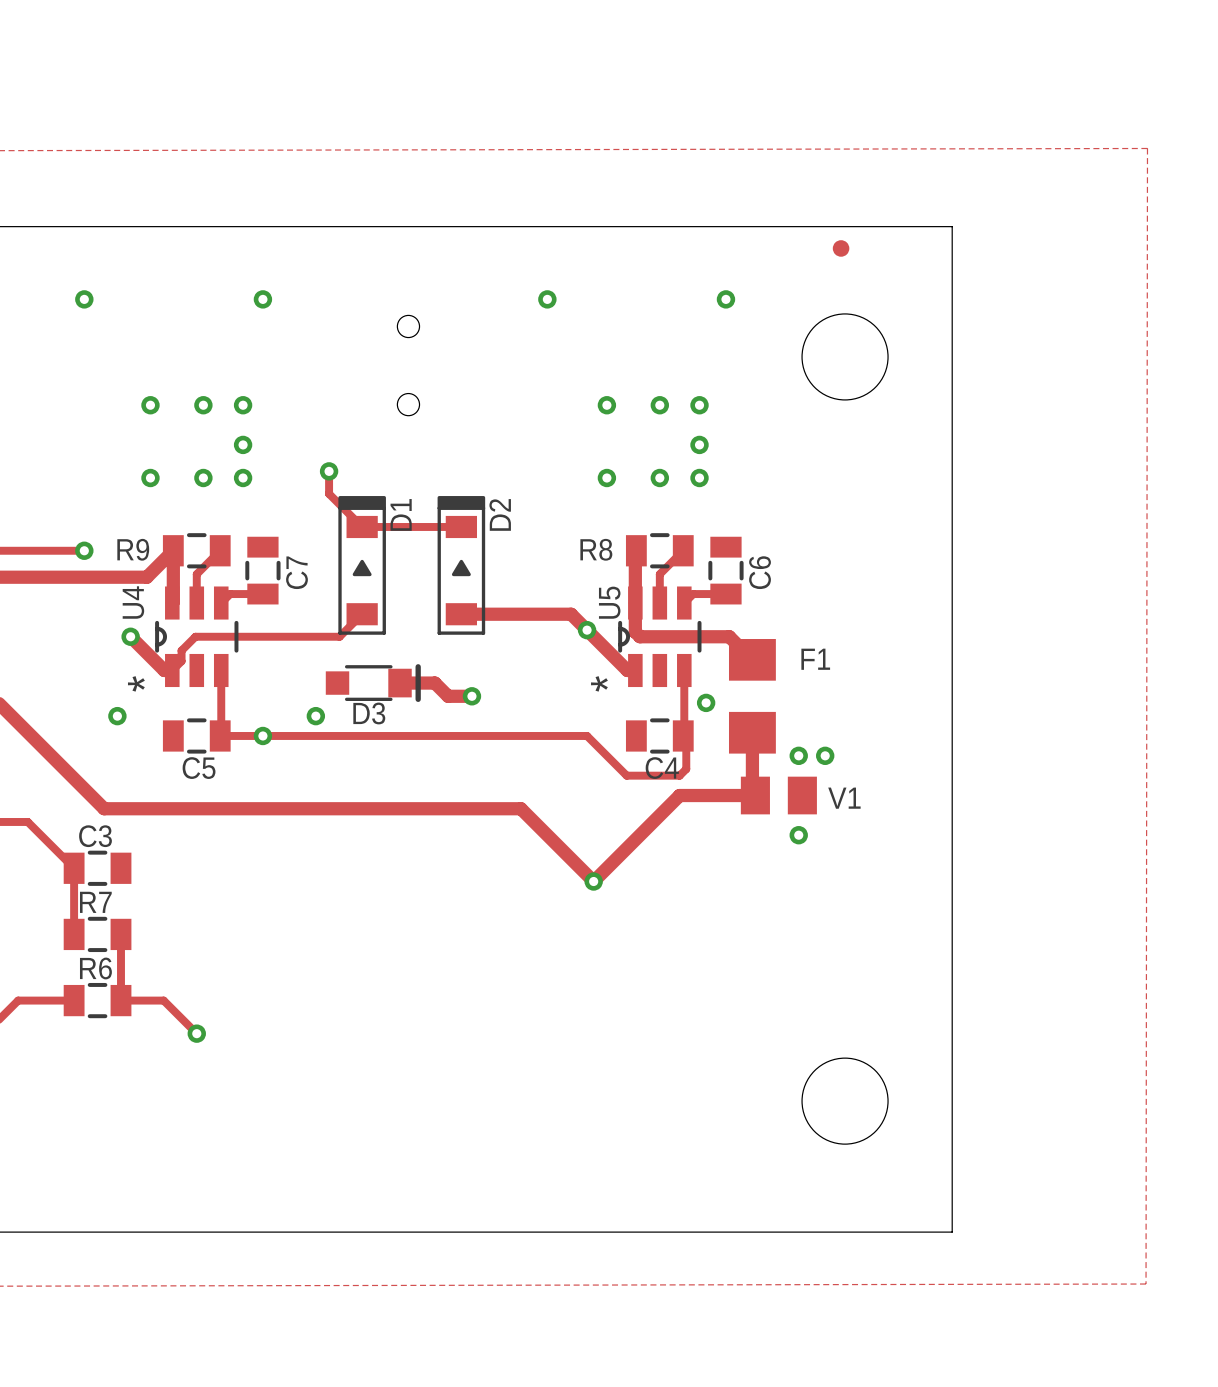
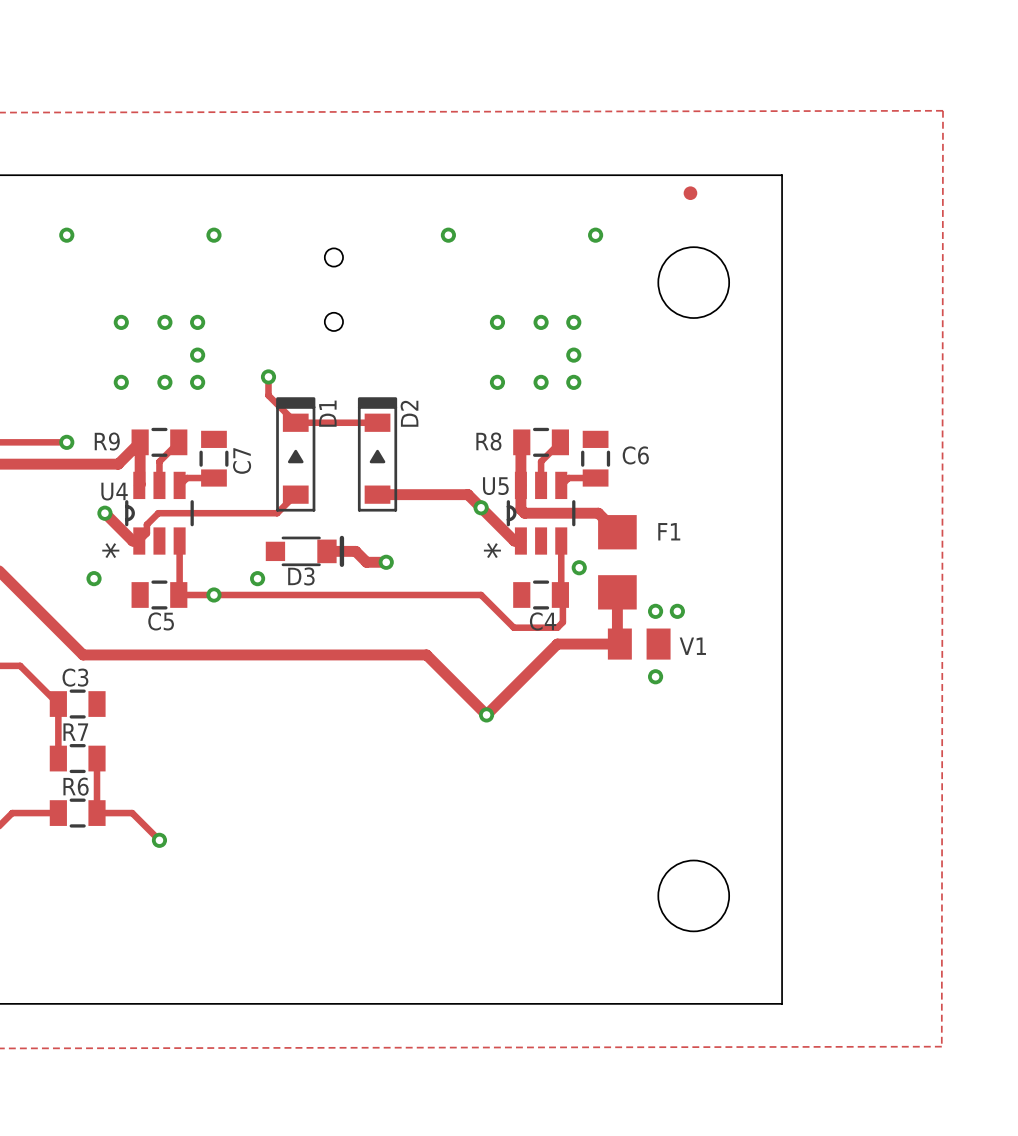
C6 name rotation: 0° (760, 572) -> 90° clockwise (635, 455)
U4 name rotation: 0° (133, 602) -> 90° clockwise (114, 491)
U5 name rotation: 0° (609, 602) -> 90° clockwise (495, 486)

